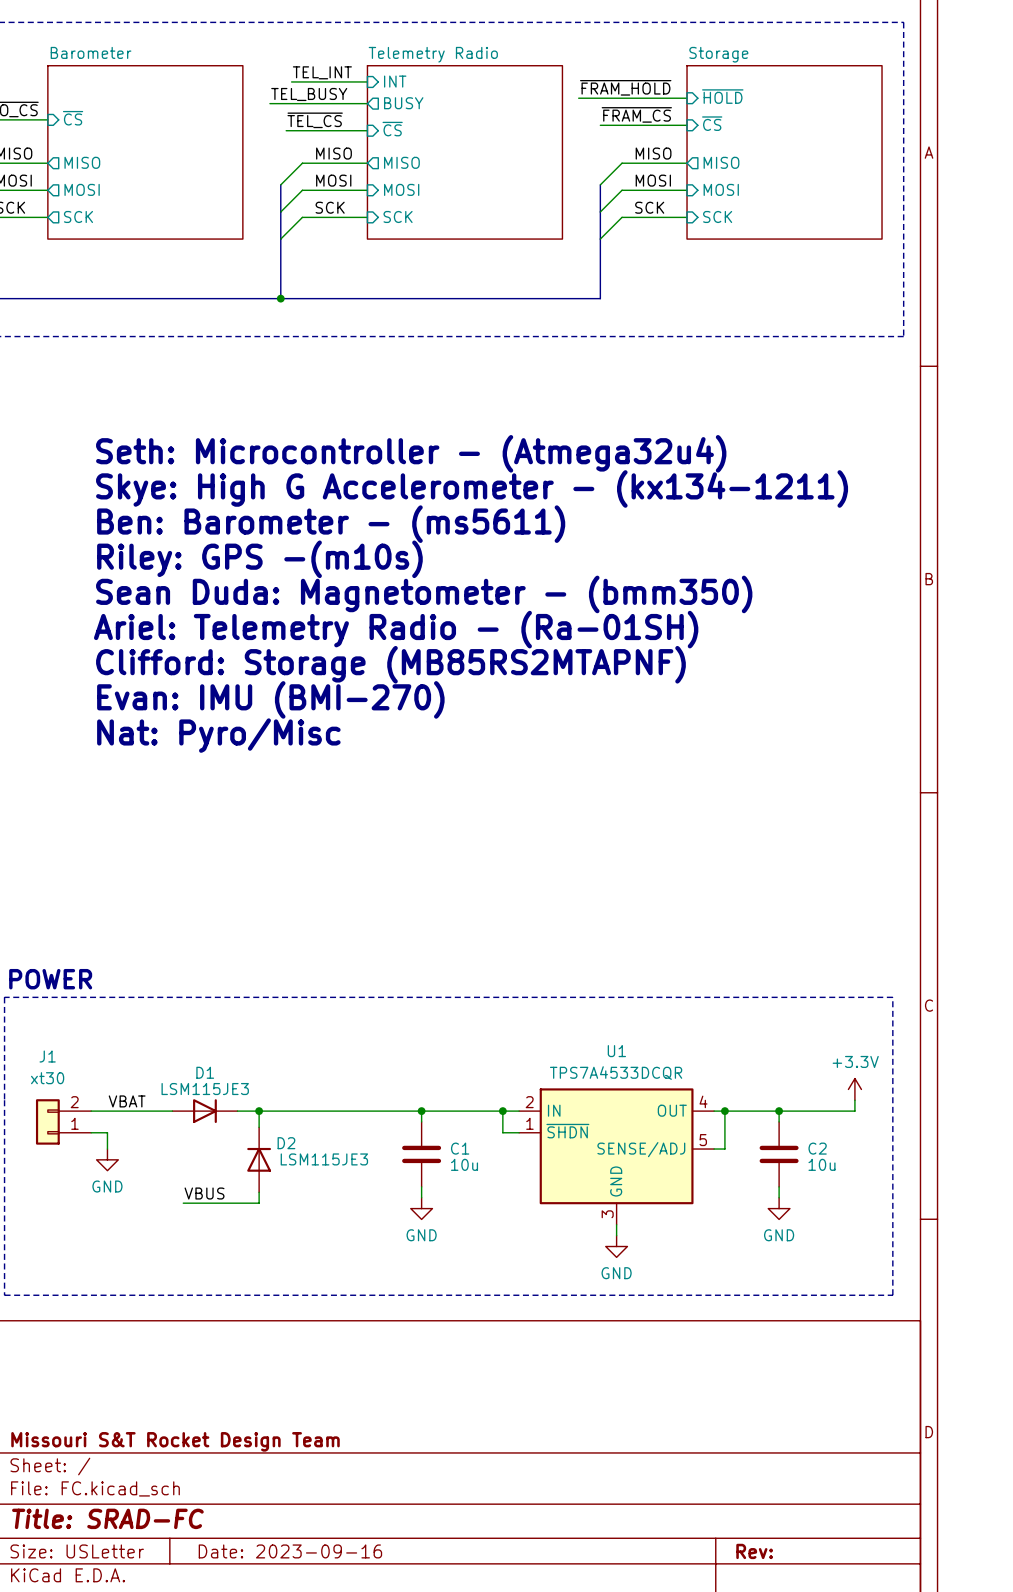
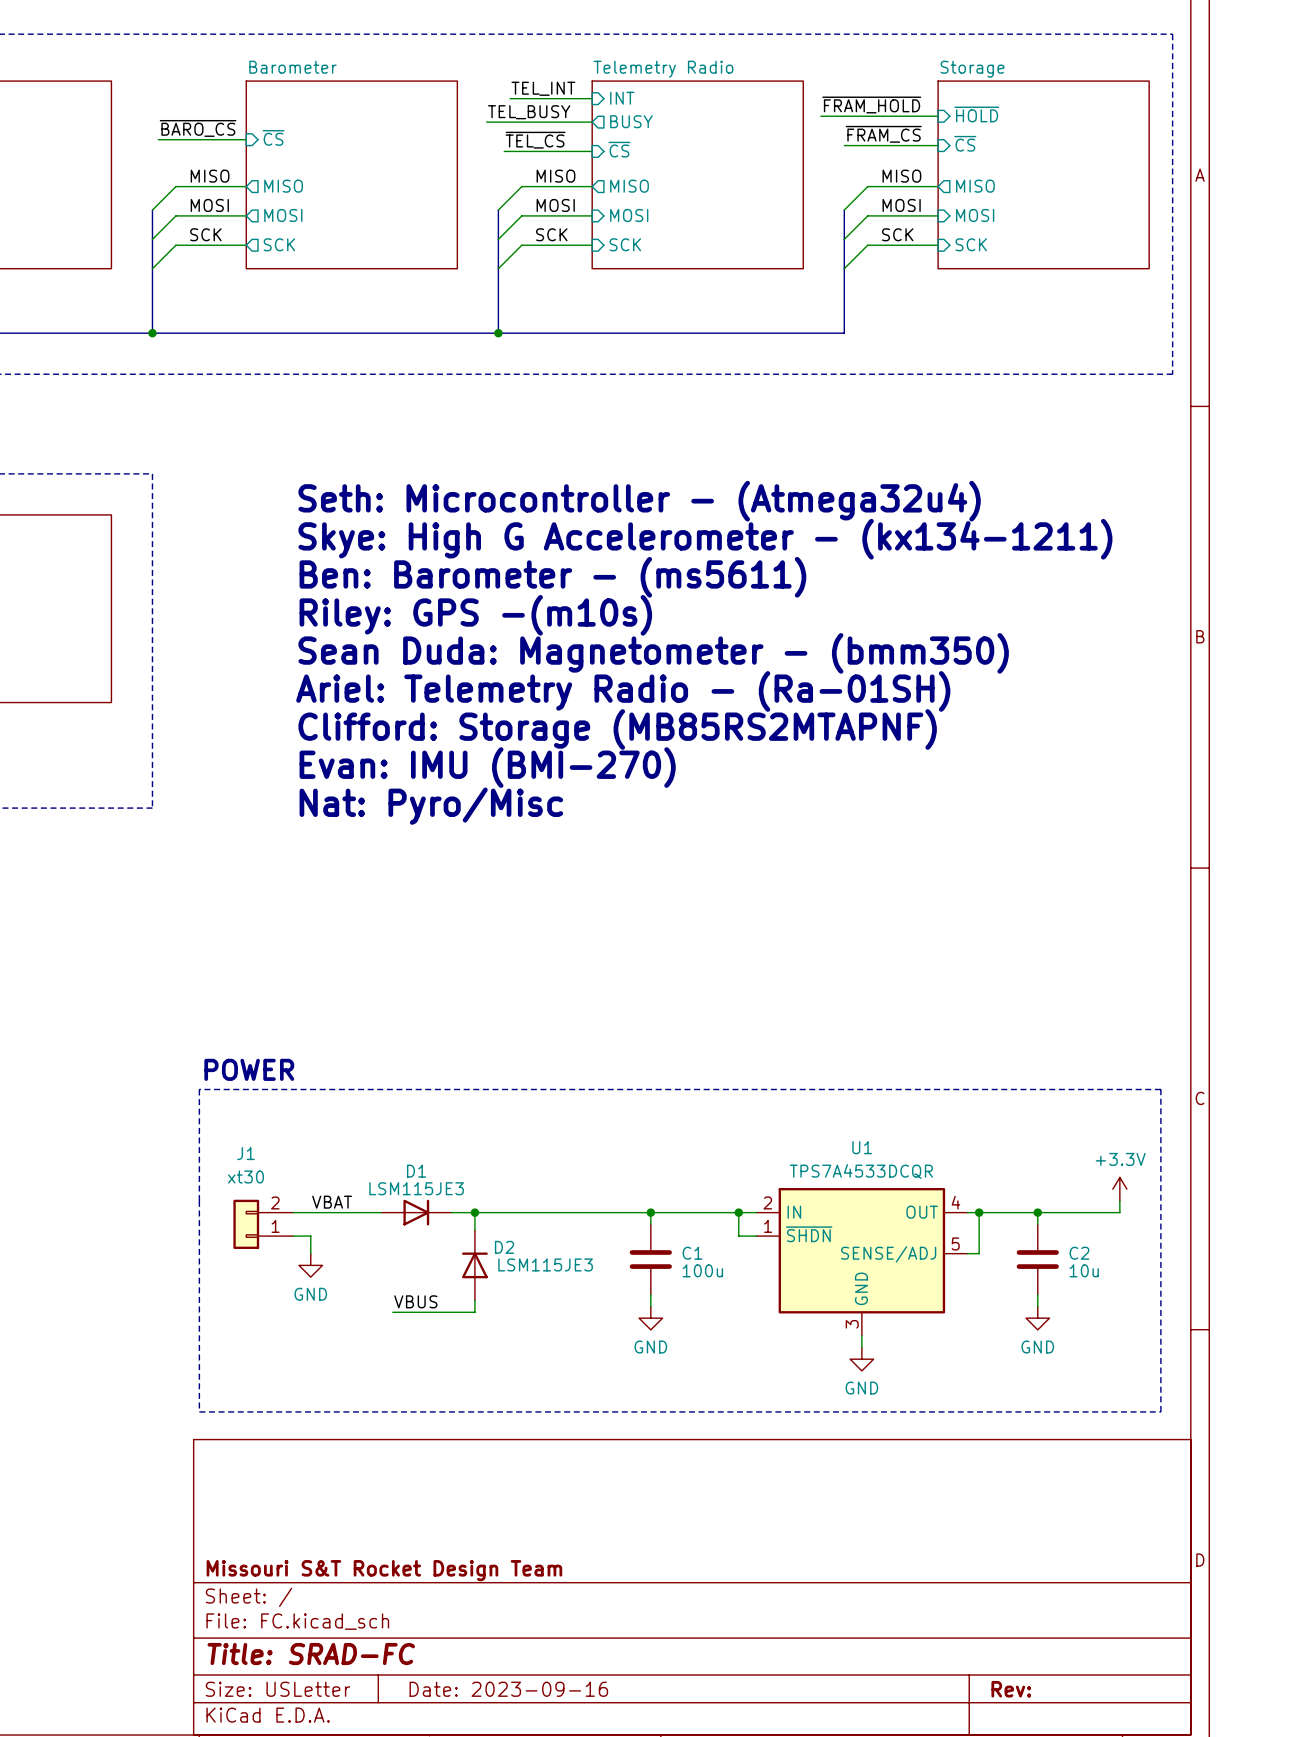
C1 value: 10u (464, 1164) -> 100u (702, 1270)

